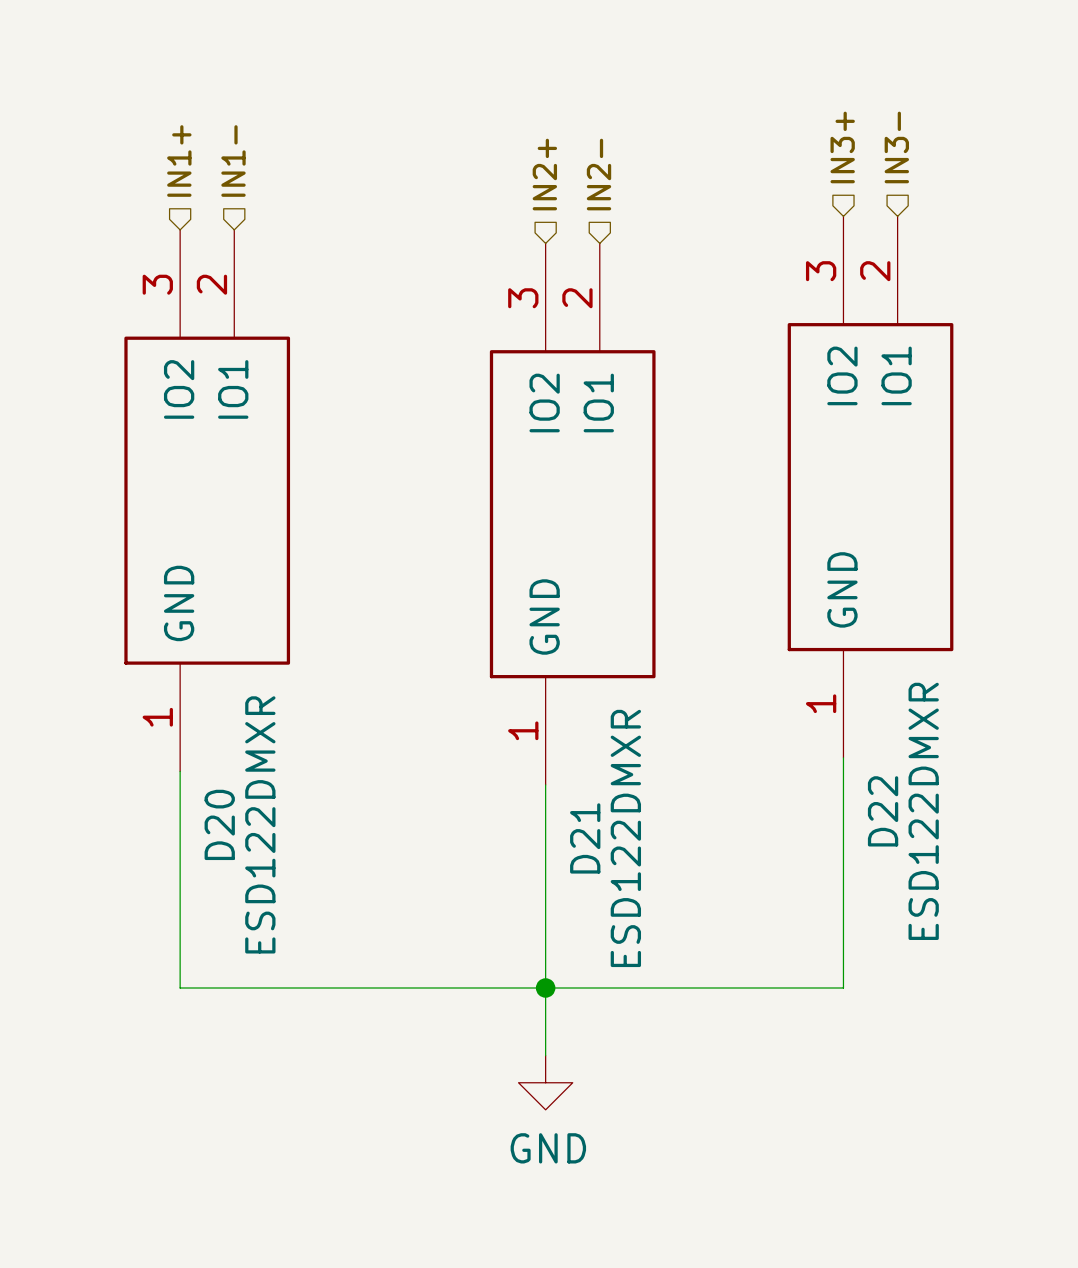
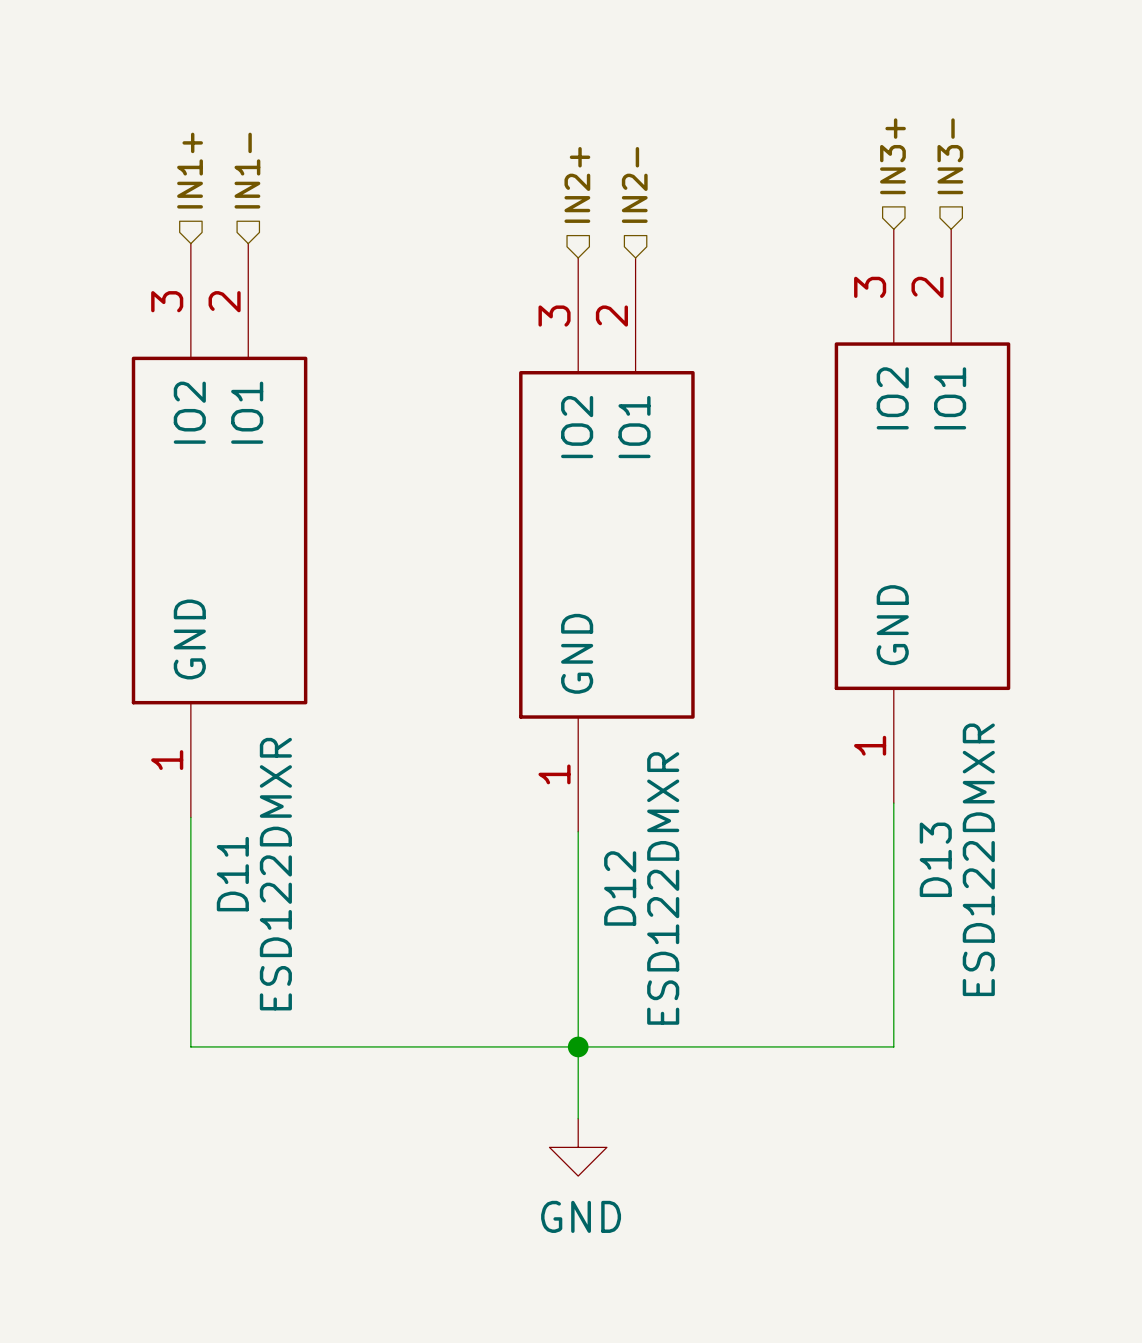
D22 name: D22 (883, 811) -> D13 (935, 859)
D20 name: D20 (219, 824) -> D11 (232, 874)
D21 name: D21 (585, 838) -> D12 (620, 888)

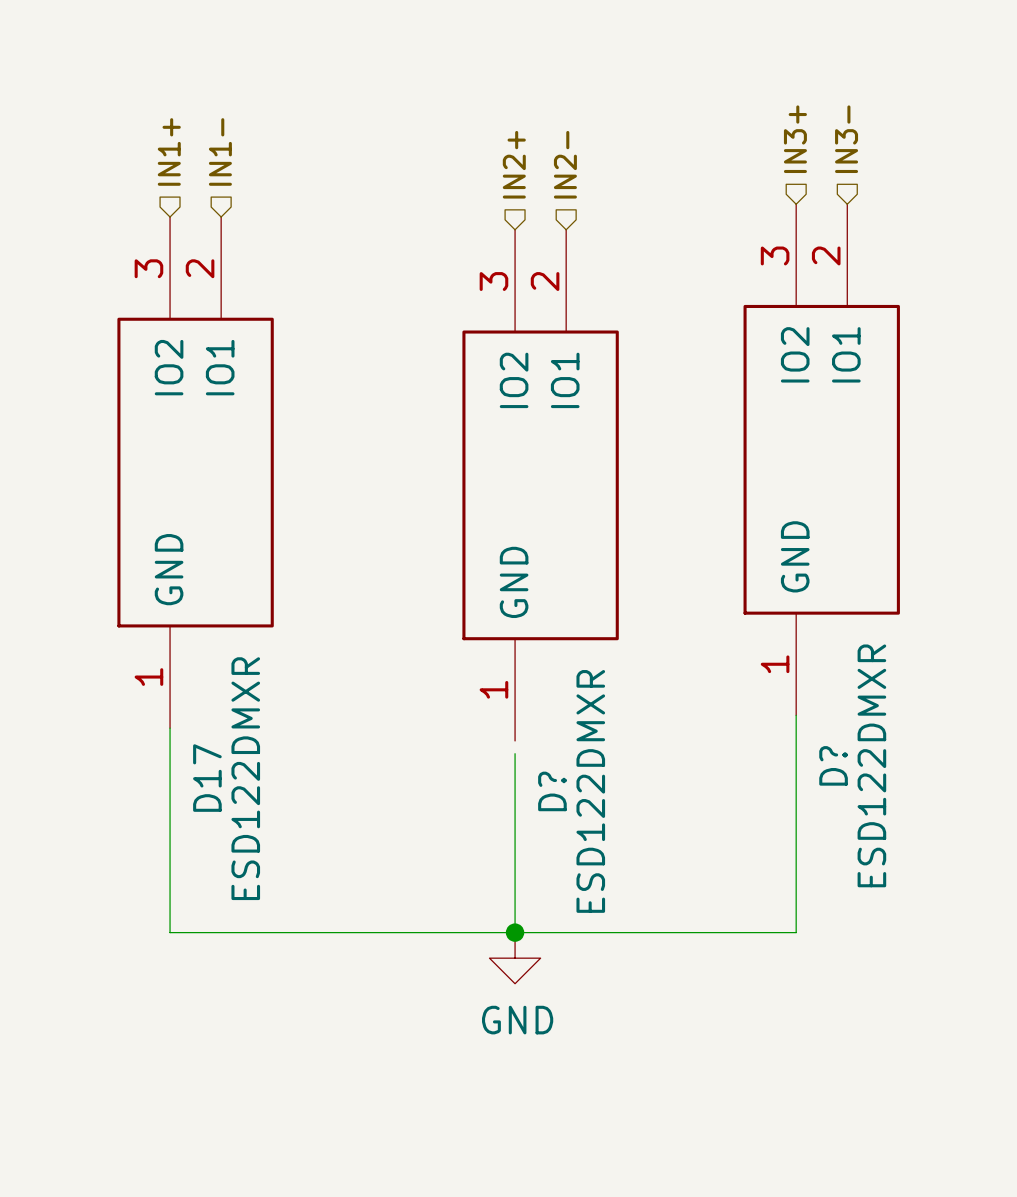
wire: (578, 831) (578, 846) -> none
D13 name: D13 (935, 859) -> D? (833, 765)
D11 name: D11 (232, 874) -> D17 (207, 778)
D12 name: D12 (620, 888) -> D? (552, 791)
wire: (578, 1046) (578, 1118) -> none
power symbol position: GND (578, 1147) -> GND (515, 958)

